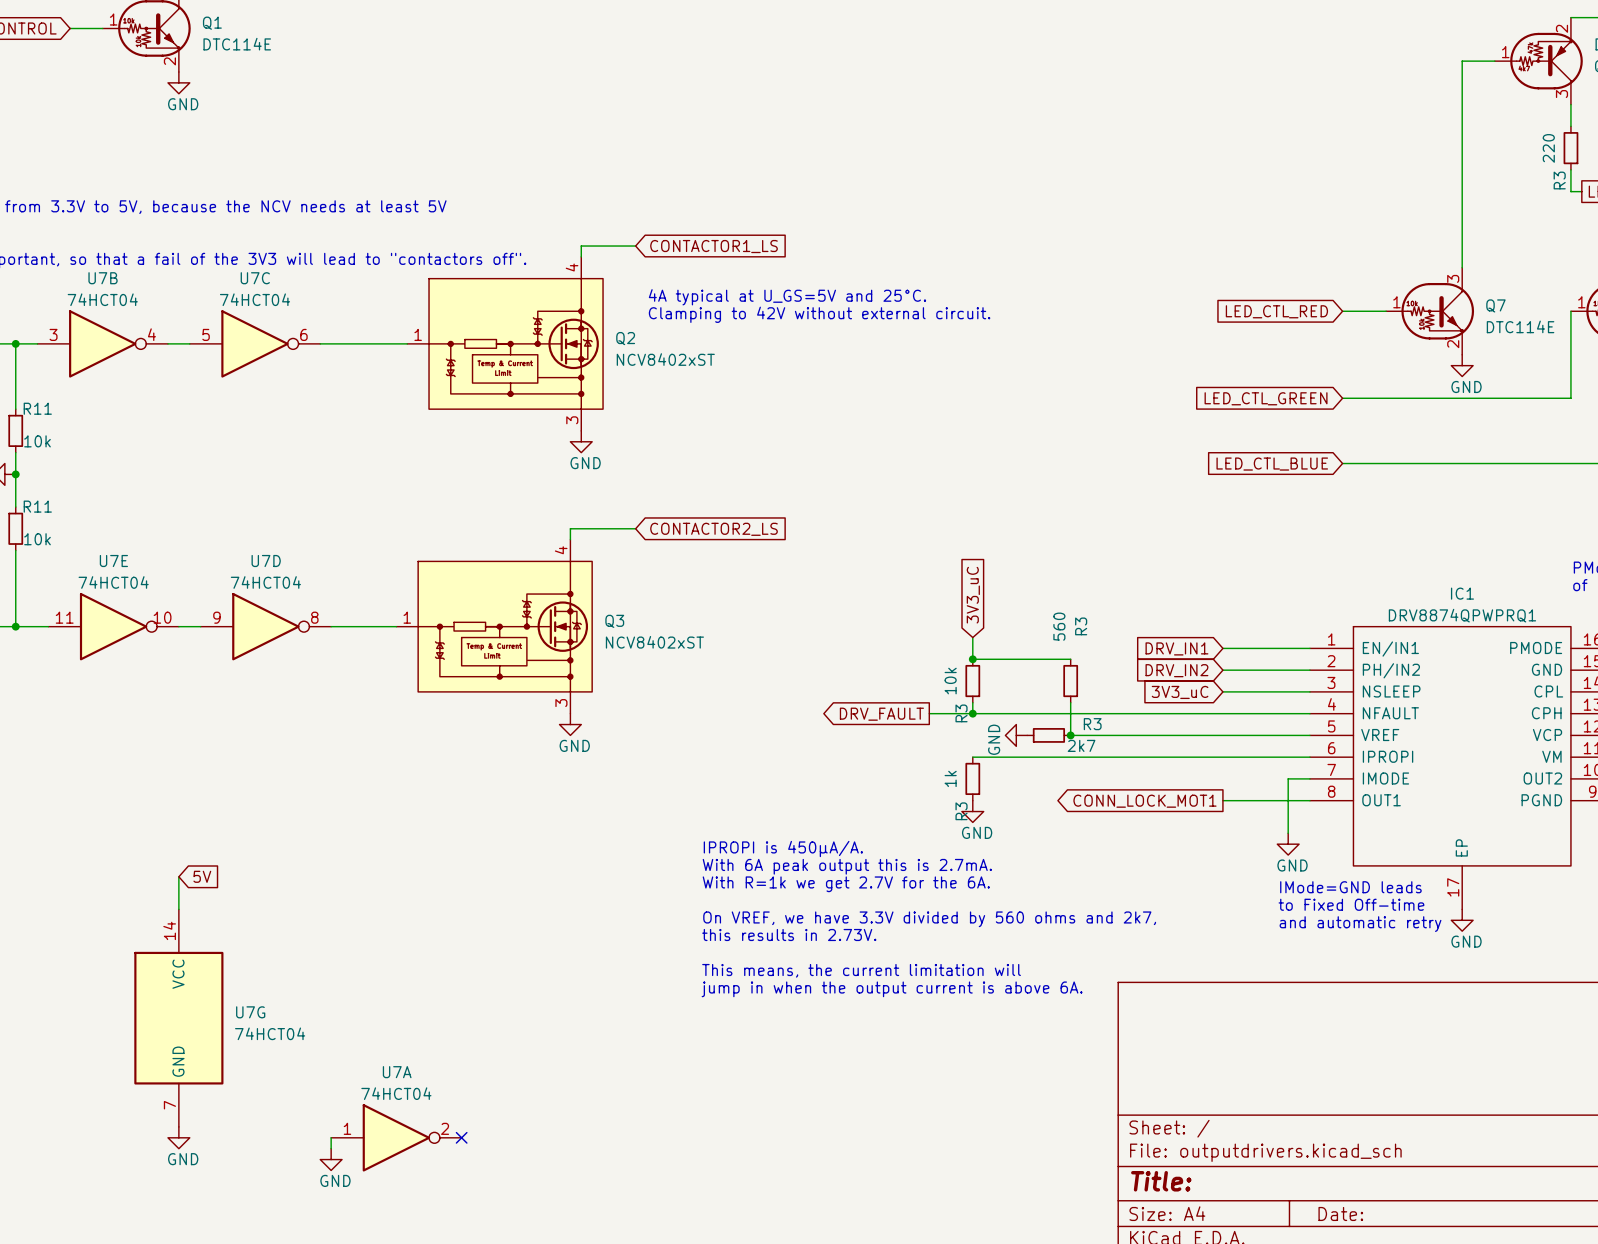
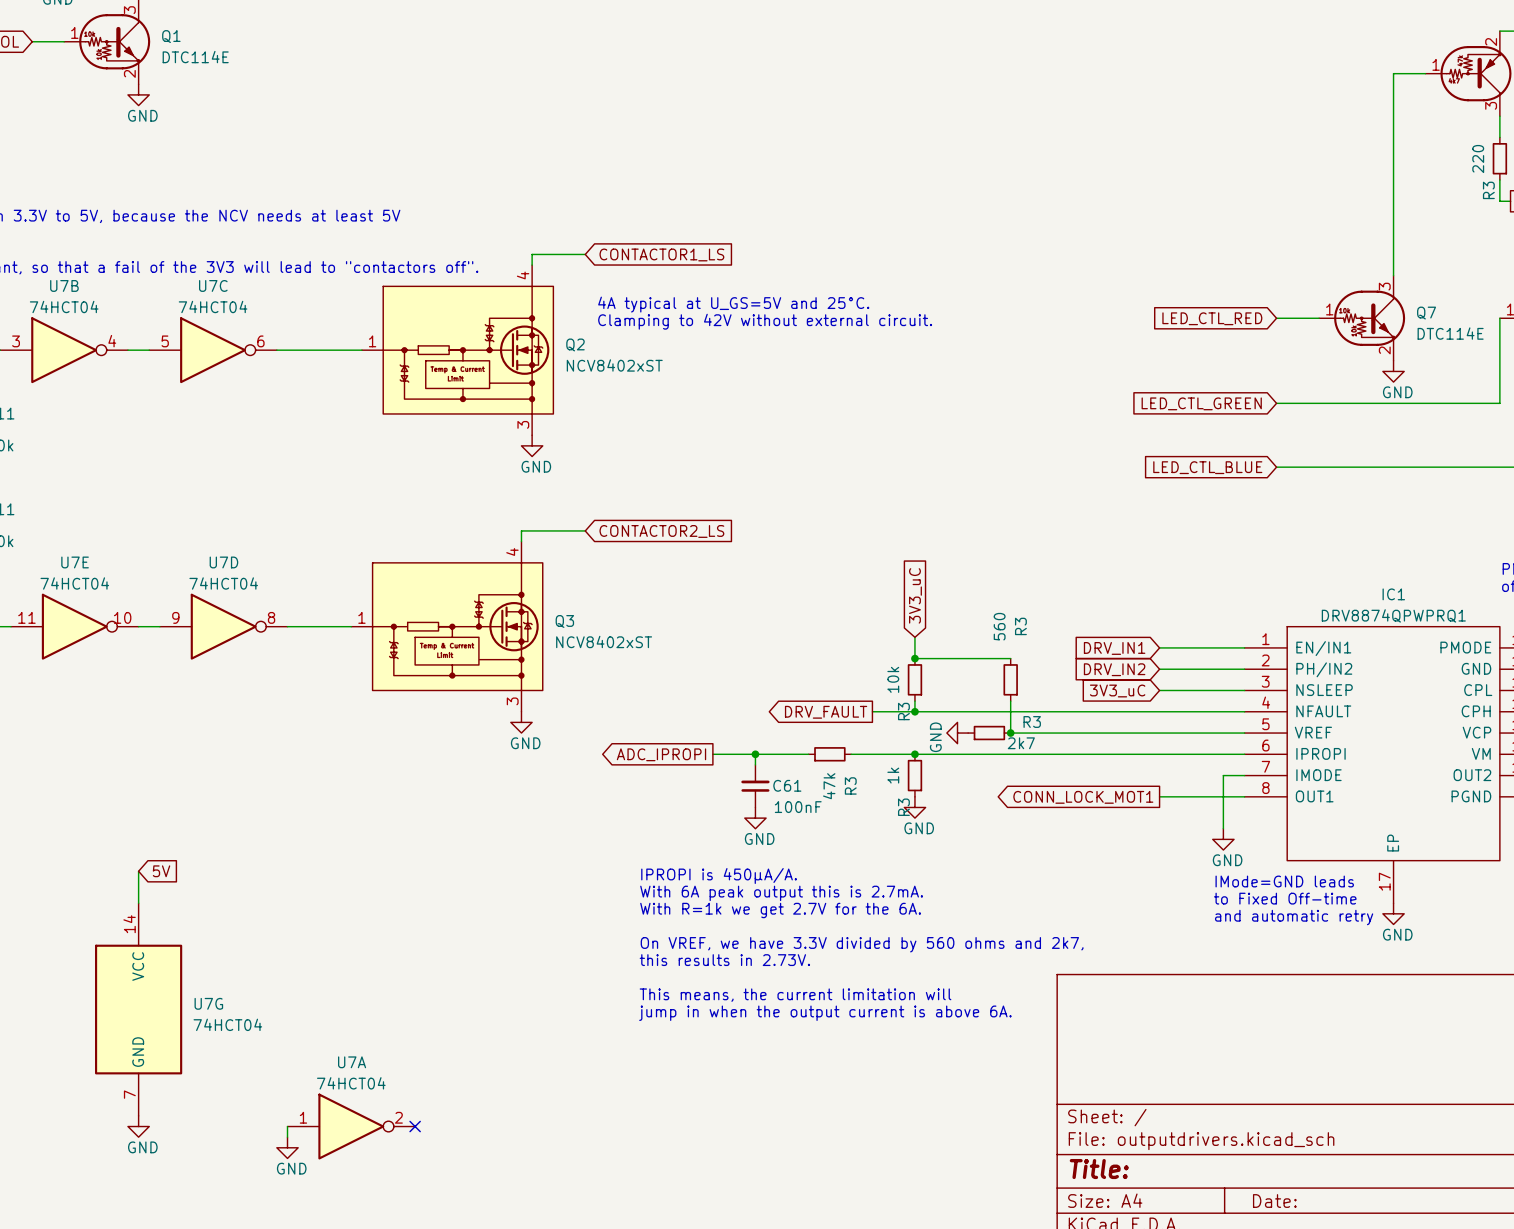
global label: none -> ADC_IPROPI (661, 754)
wire: none -> (712, 754) (808, 754)
wire: none -> (755, 754) (755, 764)
junction: none -> (755, 754)
R3: none -> 47k (829, 754)
wire: none -> (851, 754) (914, 754)
junction: none -> (914, 754)
C61: none -> 100nF (755, 786)
power symbol: none -> GND (755, 818)
text position: IPROPI is 450µA/A. (783, 849) -> IPROPI is 450µA/A. (719, 876)
text position: With 6A peak output this is 2.7mA. (847, 866) -> With 6A peak output this is 2.7mA. (781, 893)
text position: With R=1k we get 2.7V for the 6A. (846, 884) -> With R=1k we get 2.7V for the 6A. (780, 910)
text position: On VREF, we have 3.3V divided by 560 ohms and 2k7, (929, 919) -> On VREF, we have 3.3V divided by 560 ohms and 2k7, (862, 944)
text position: this results in 2.73V. (789, 934) -> this results in 2.73V. (724, 960)
text position: This means, the current limitation will (861, 970) -> This means, the current limitation will (795, 995)
text position: jump in when the output current is above 6A. (892, 989) -> jump in when the output current is above 6A. (825, 1013)

